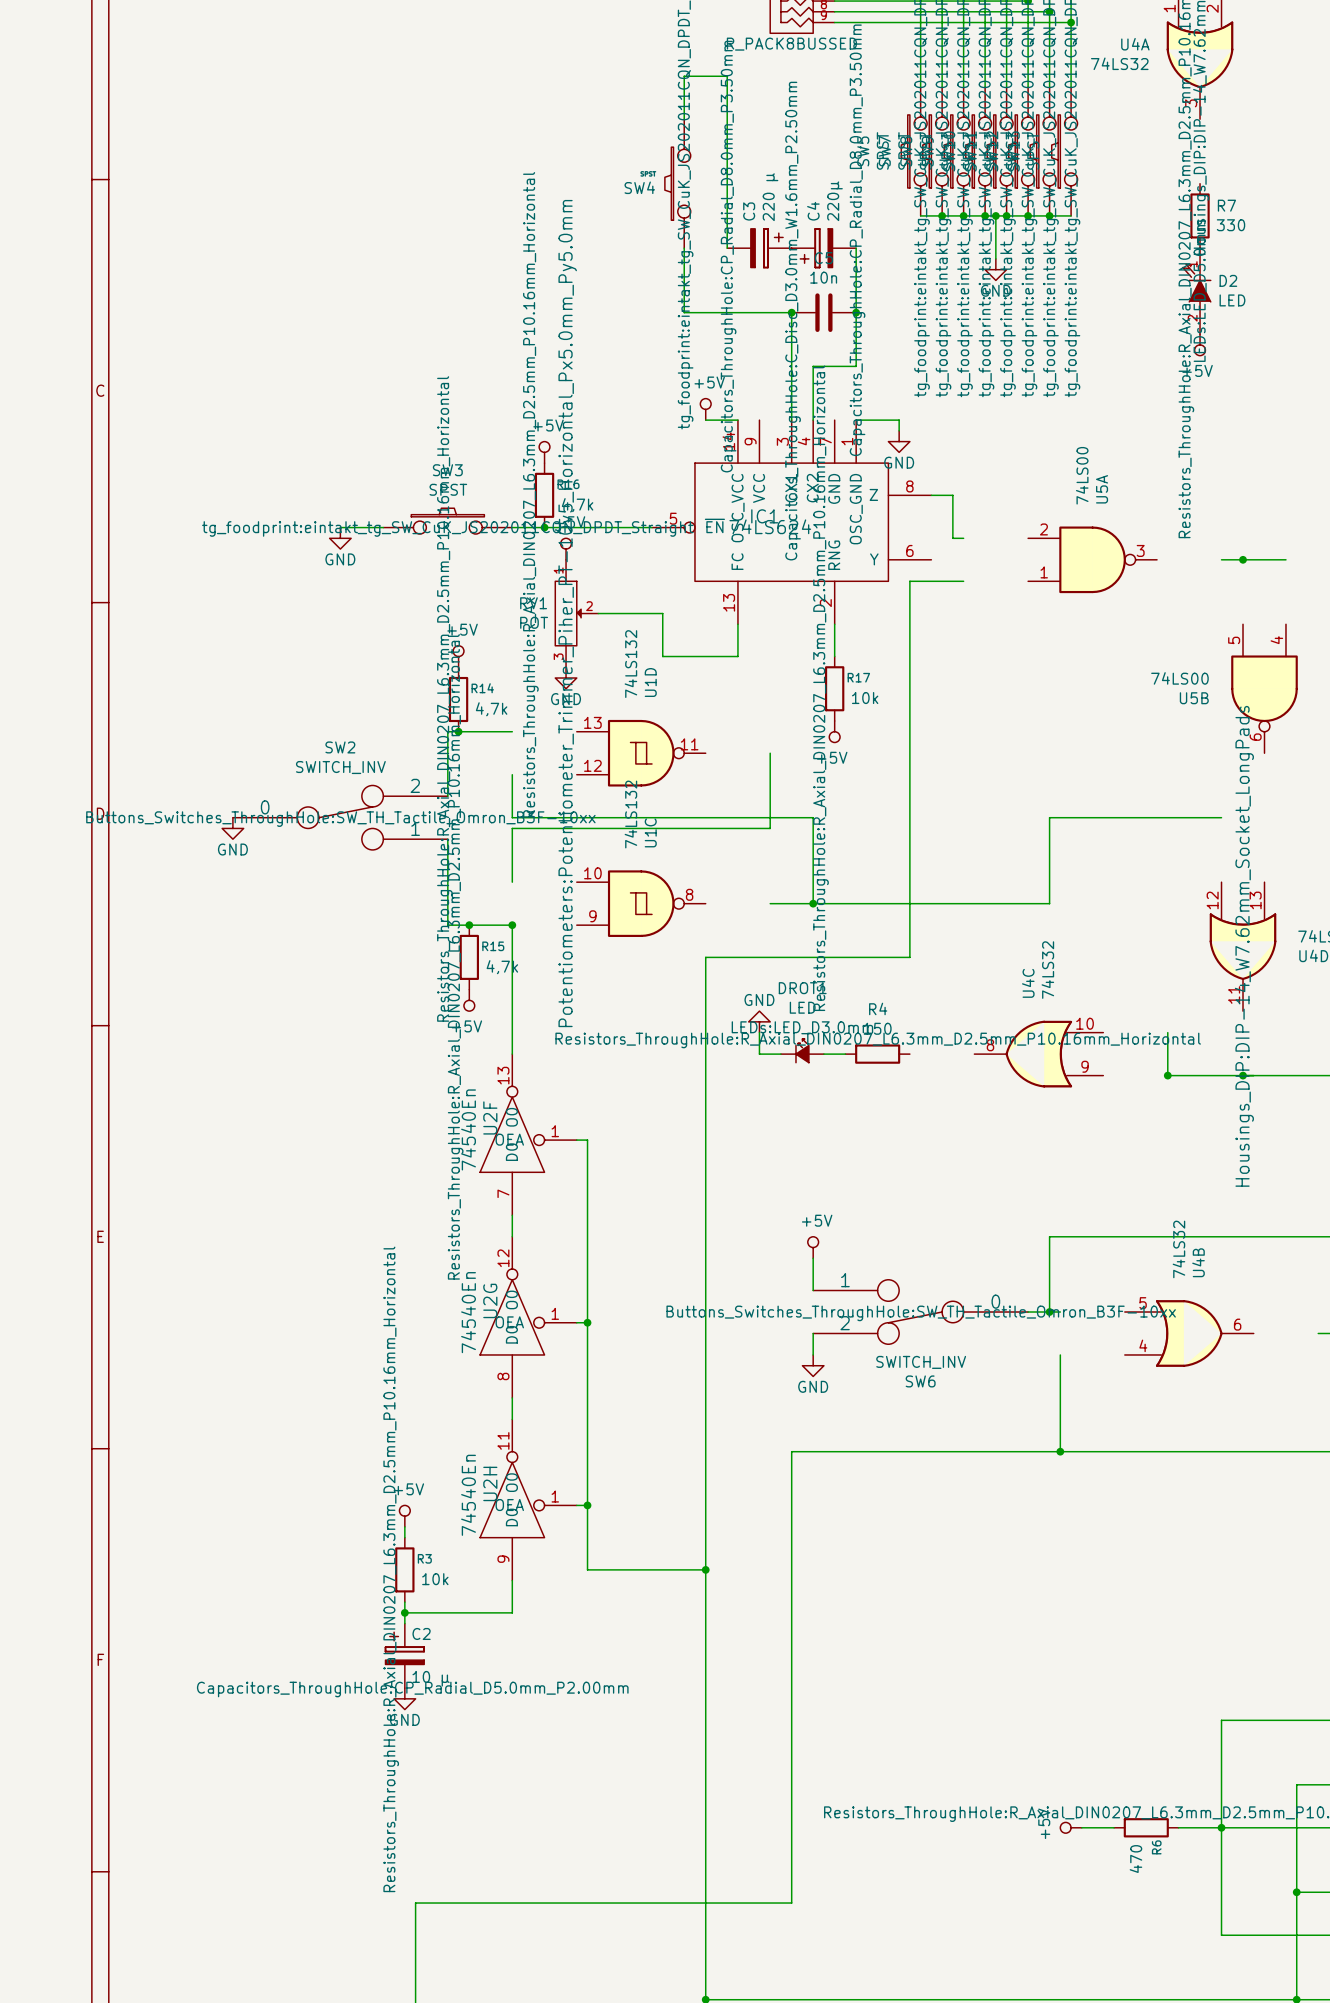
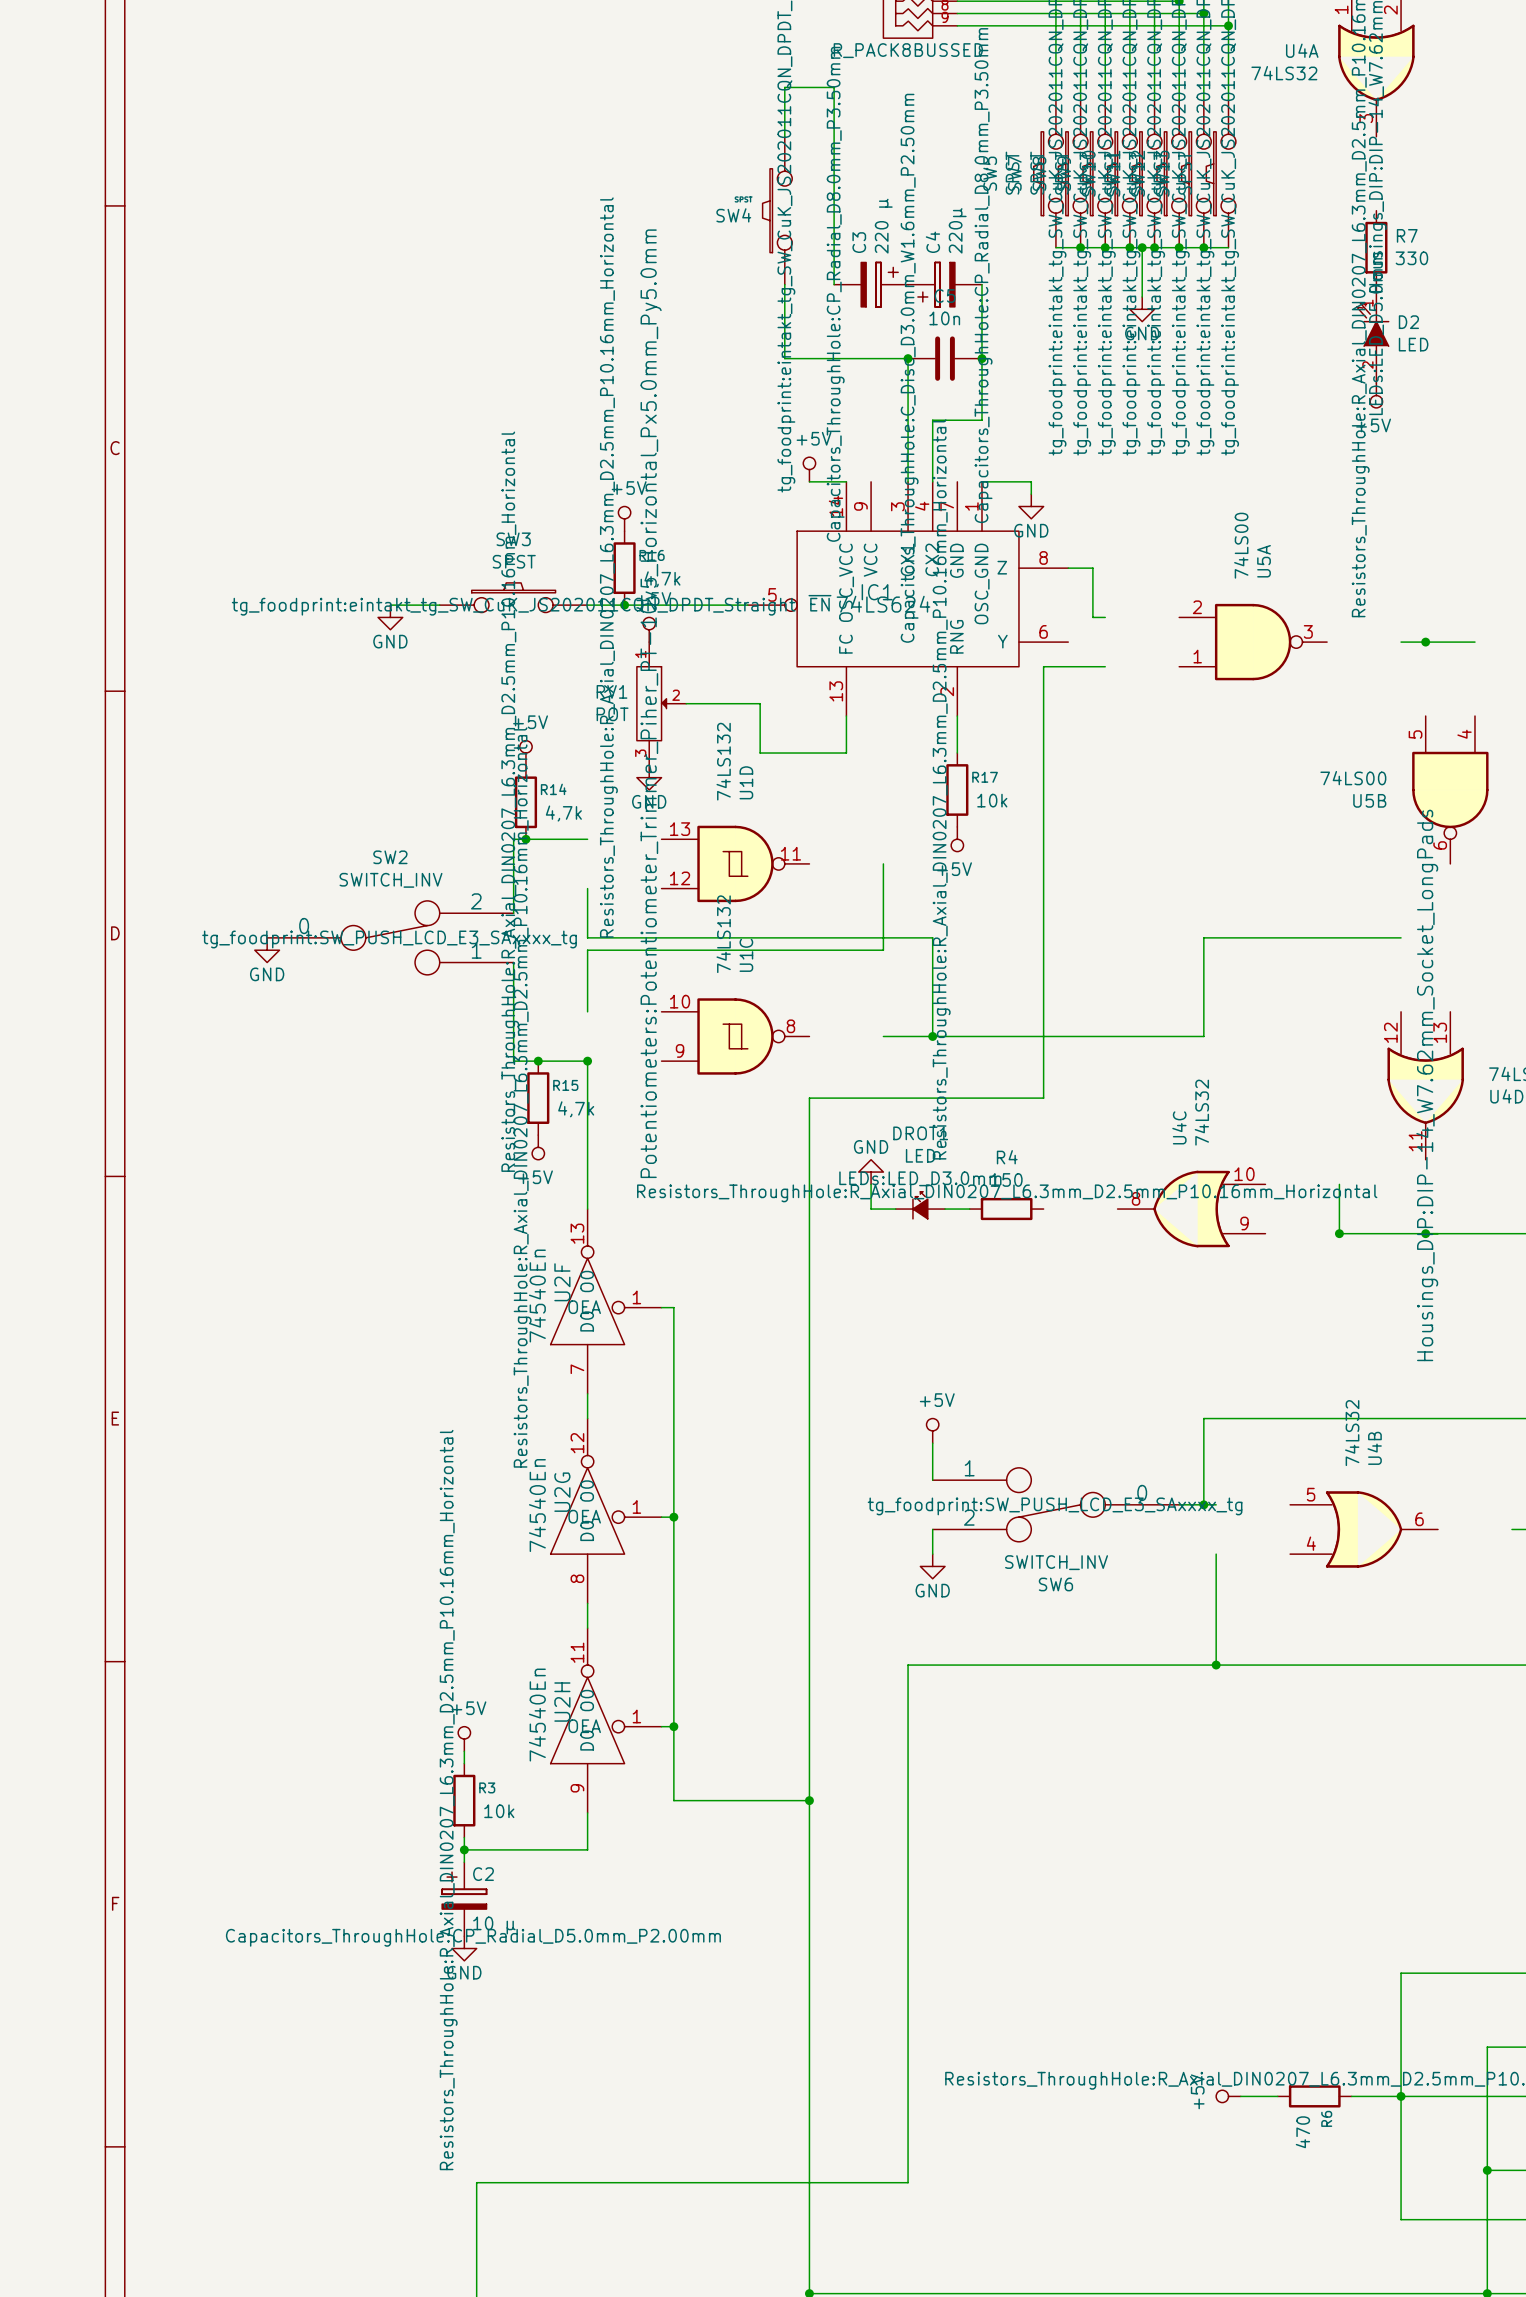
SW2 text: Buttons_Switches_ThroughHole:SW_TH_Tactile_Omron_B3F-10xx (340, 819) -> tg_foodprint:SW_PUSH_LCD_E3_SAxxxx_tg (389, 939)
SW6 text: Buttons_Switches_ThroughHole:SW_TH_Tactile_Omron_B3F-10xx (921, 1313) -> tg_foodprint:SW_PUSH_LCD_E3_SAxxxx_tg (1055, 1506)

